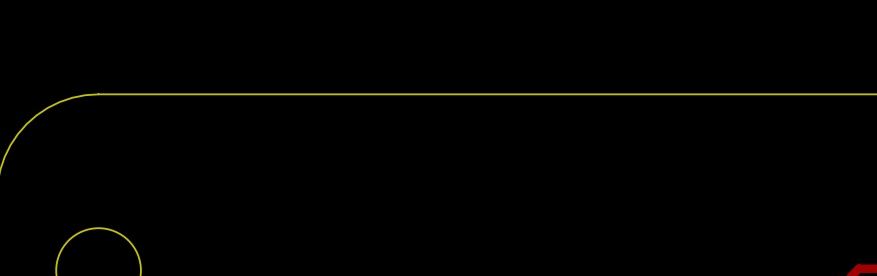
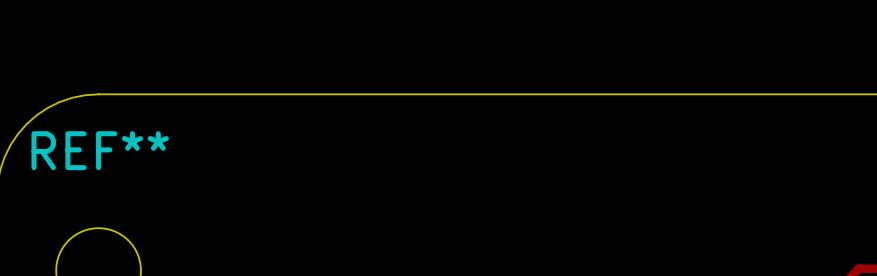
REF** name: none -> REF** (100, 150)

